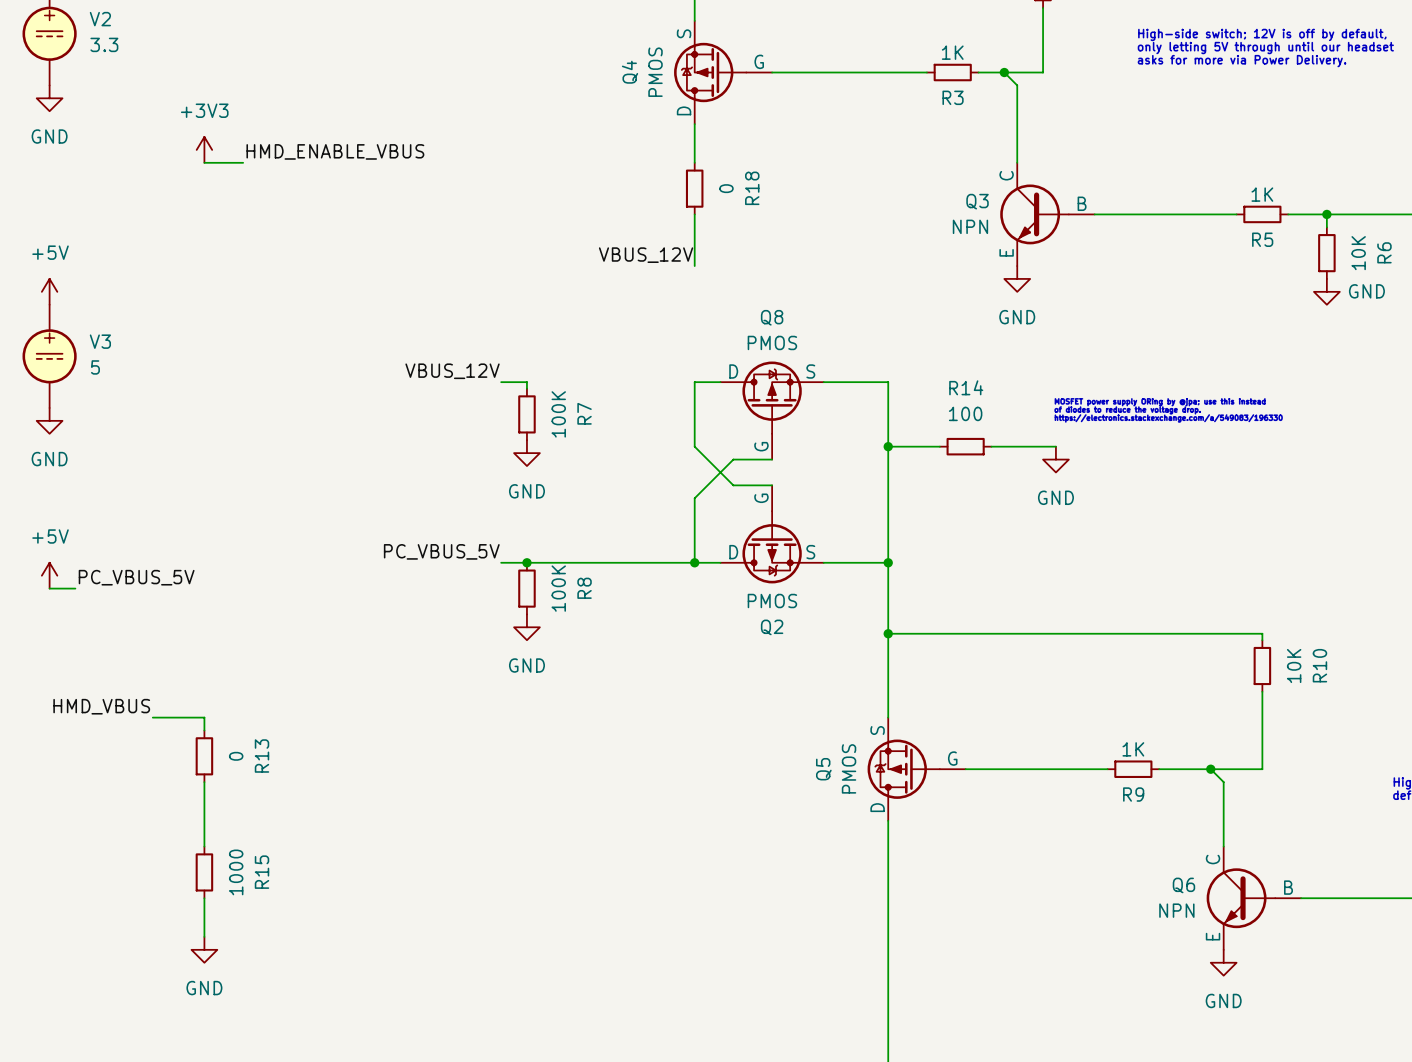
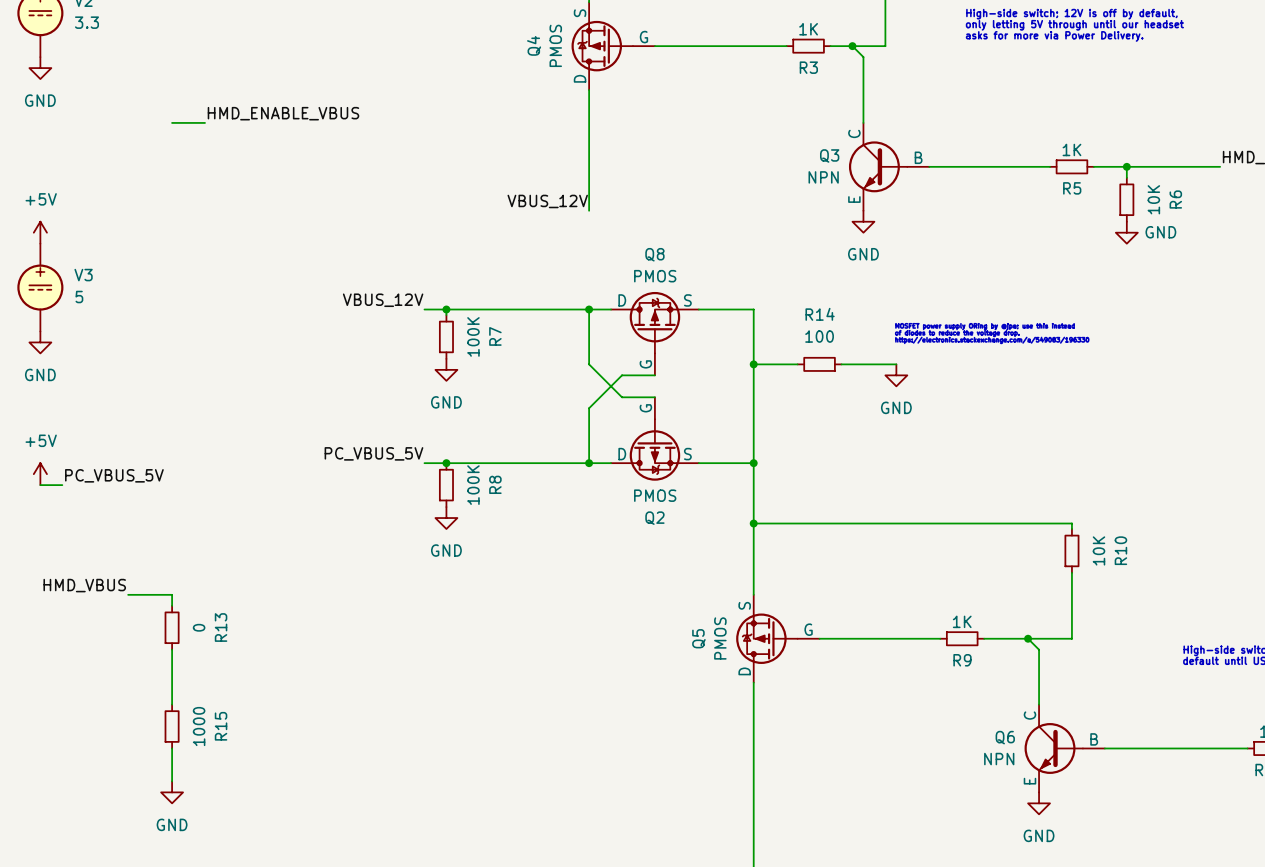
power symbol: +3V3 (204, 149) -> none
wire: none -> (589, 122) (589, 166)
R18: 0 (694, 188) -> none
wire: none -> (446, 309) (589, 309)
junction: none -> (446, 309)
junction: none -> (589, 309)

